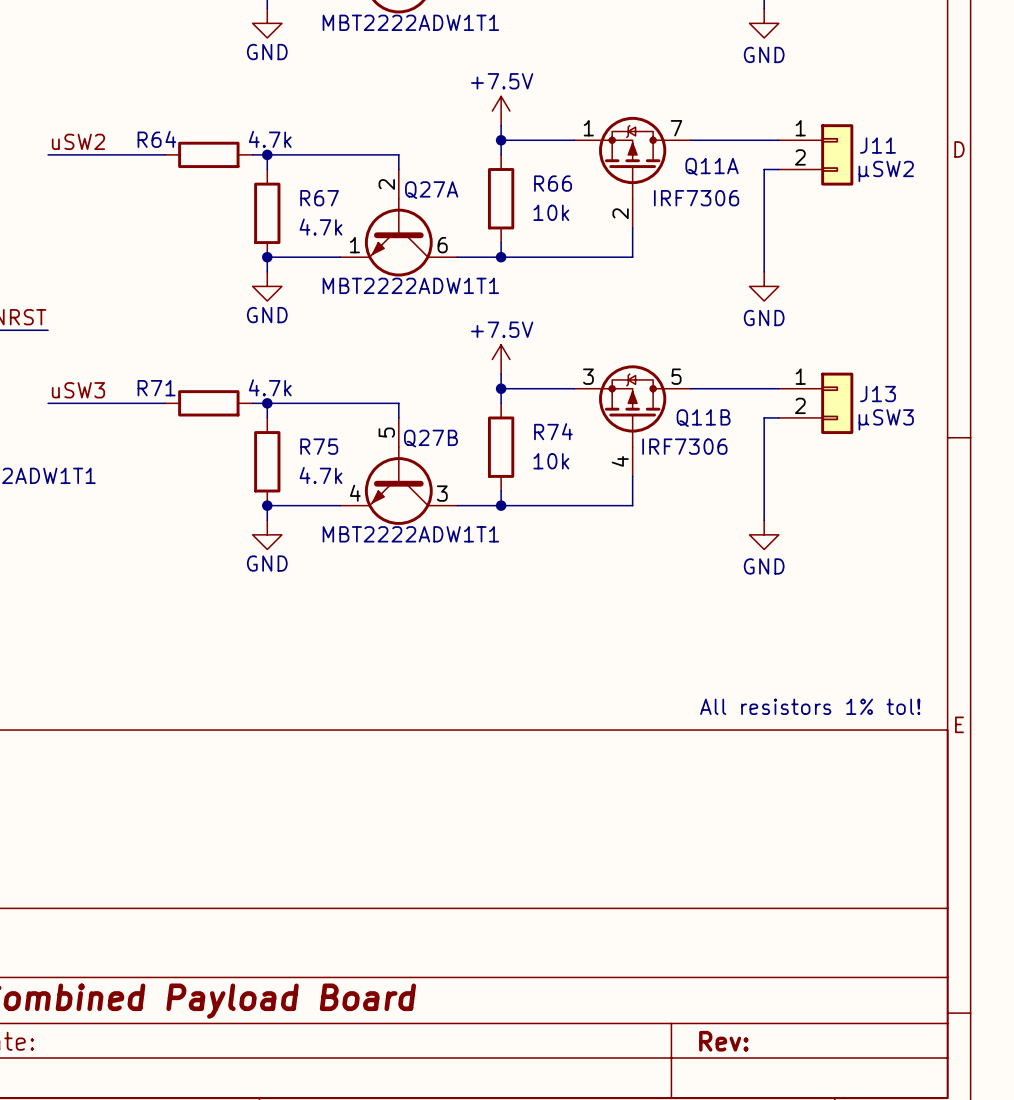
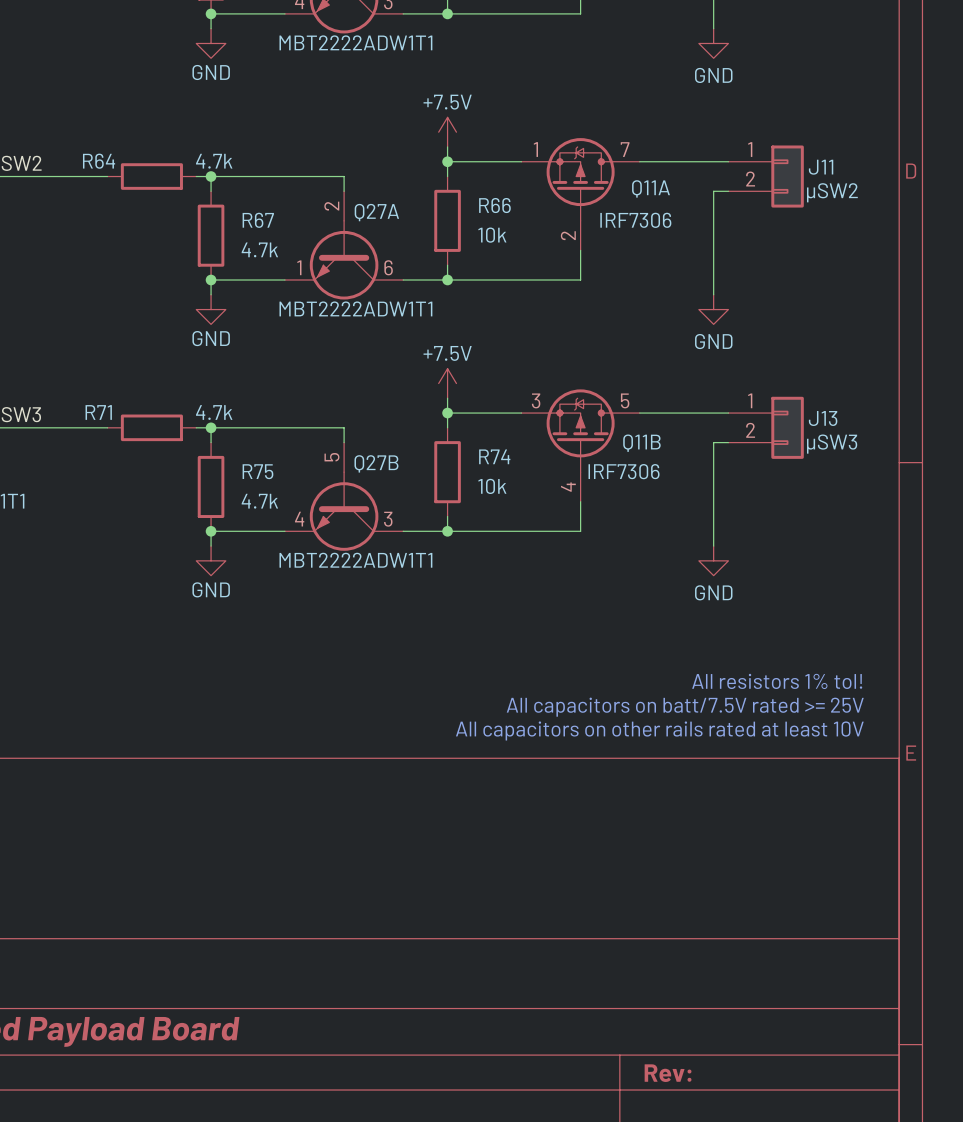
text: none -> All capacitors on batt/7.5V rated >= 25V (685, 707)
text: none -> All capacitors on other rails rated at least 10V (659, 730)
text position: All resistors 1% tol! (810, 706) -> All resistors 1% tol! (777, 681)

